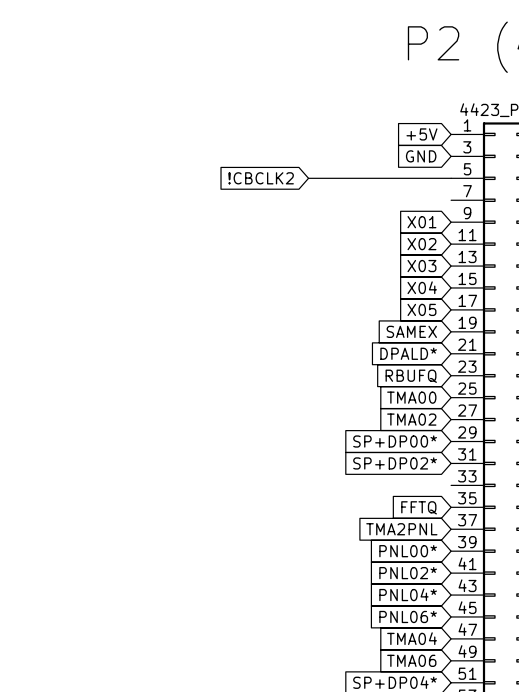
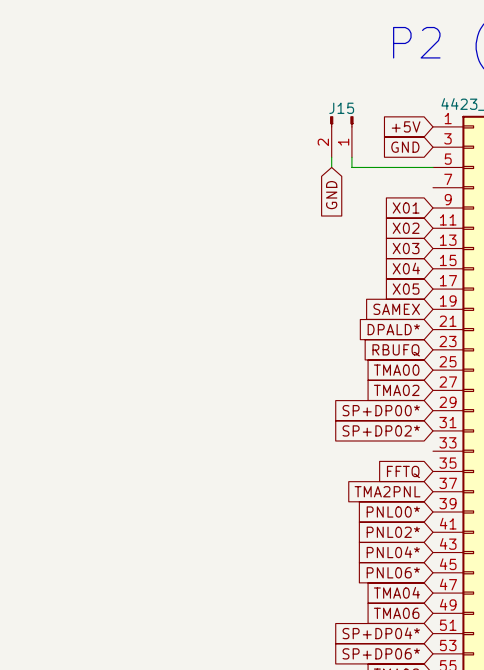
J15: none -> (341, 136)
wire: none -> (331, 157) (331, 167)
global label: !CBCLK2 (261, 178) -> none
wire: (308, 178) (363, 178) -> (351, 157) (351, 167)
global label: none -> GND (331, 195)

